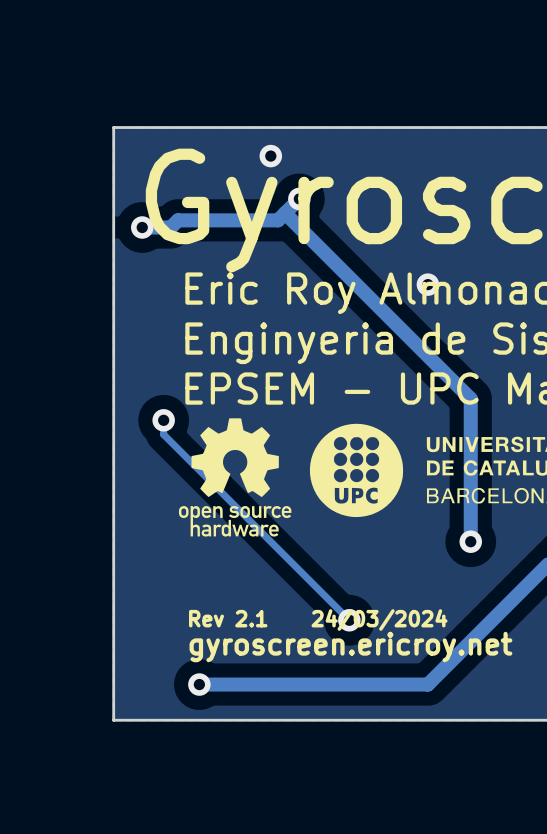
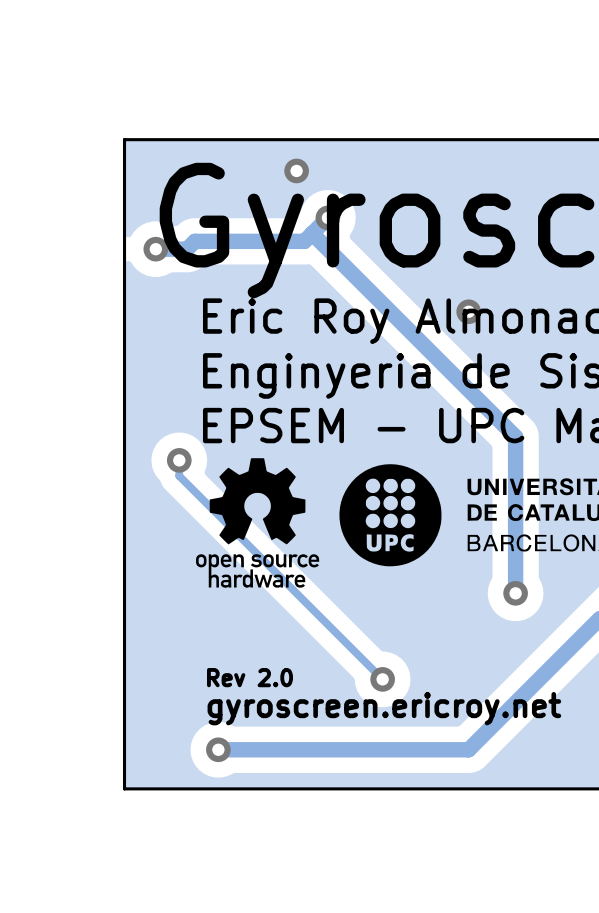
text: Rev 2.1 24/03/2024 (318, 620) -> Rev 2.0 (250, 677)

